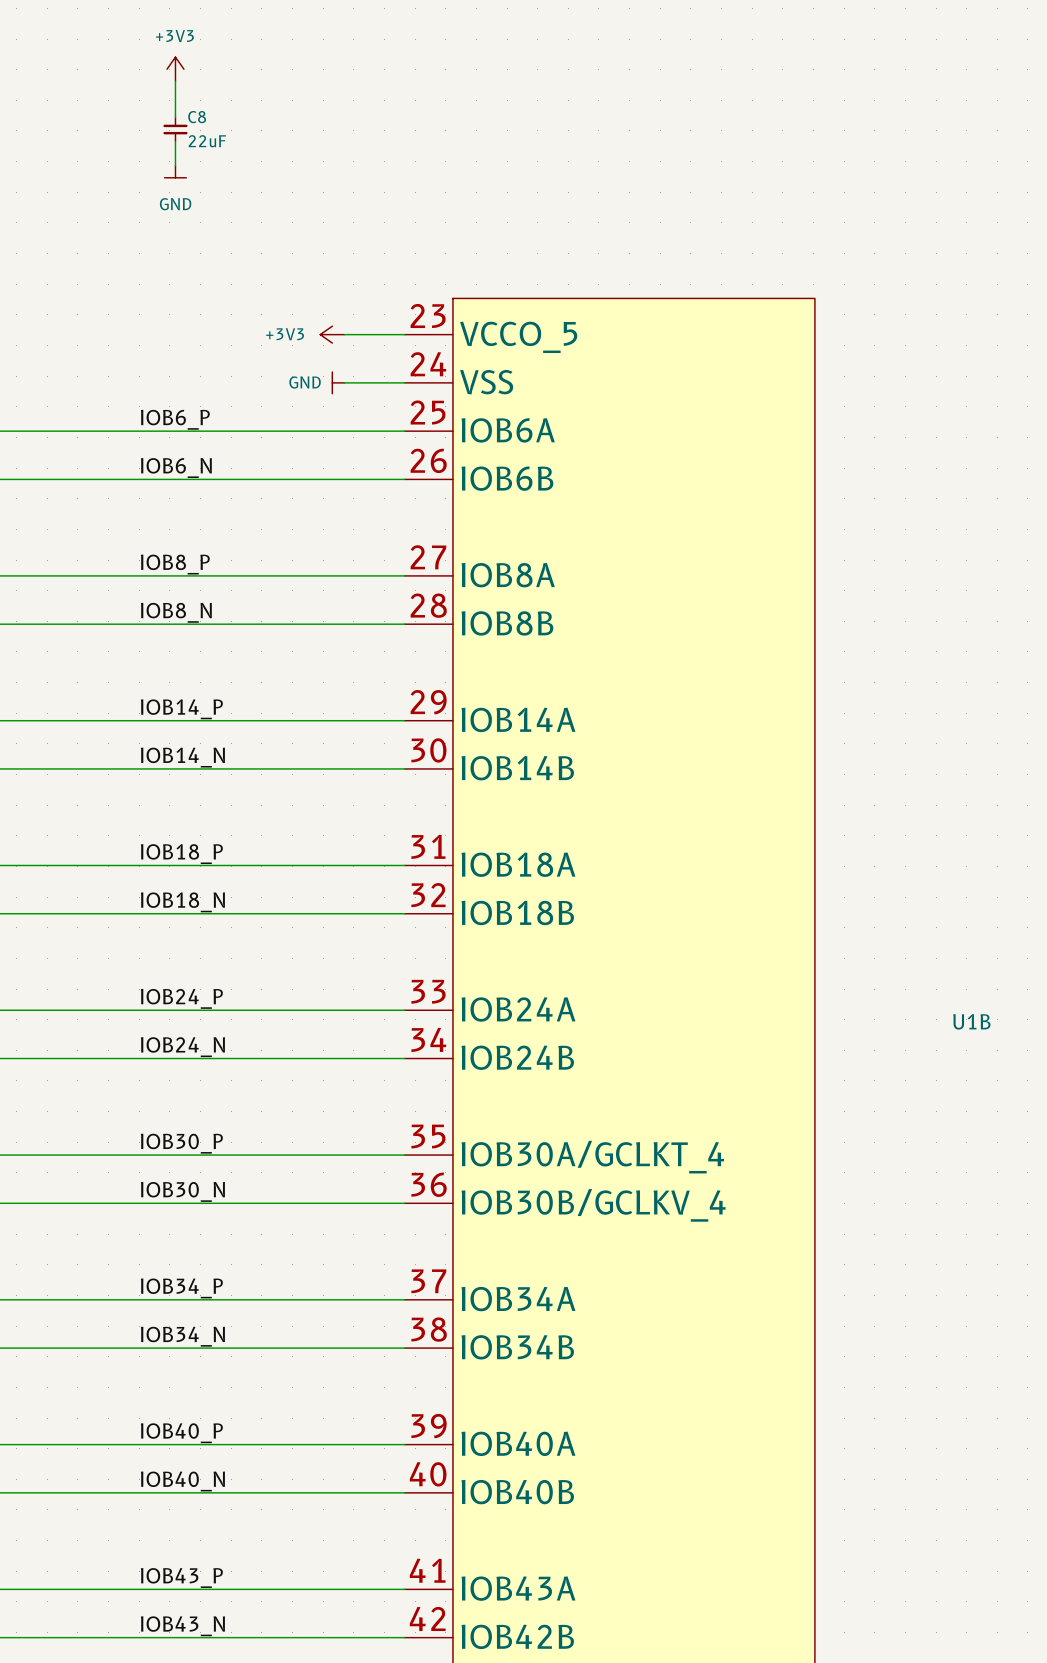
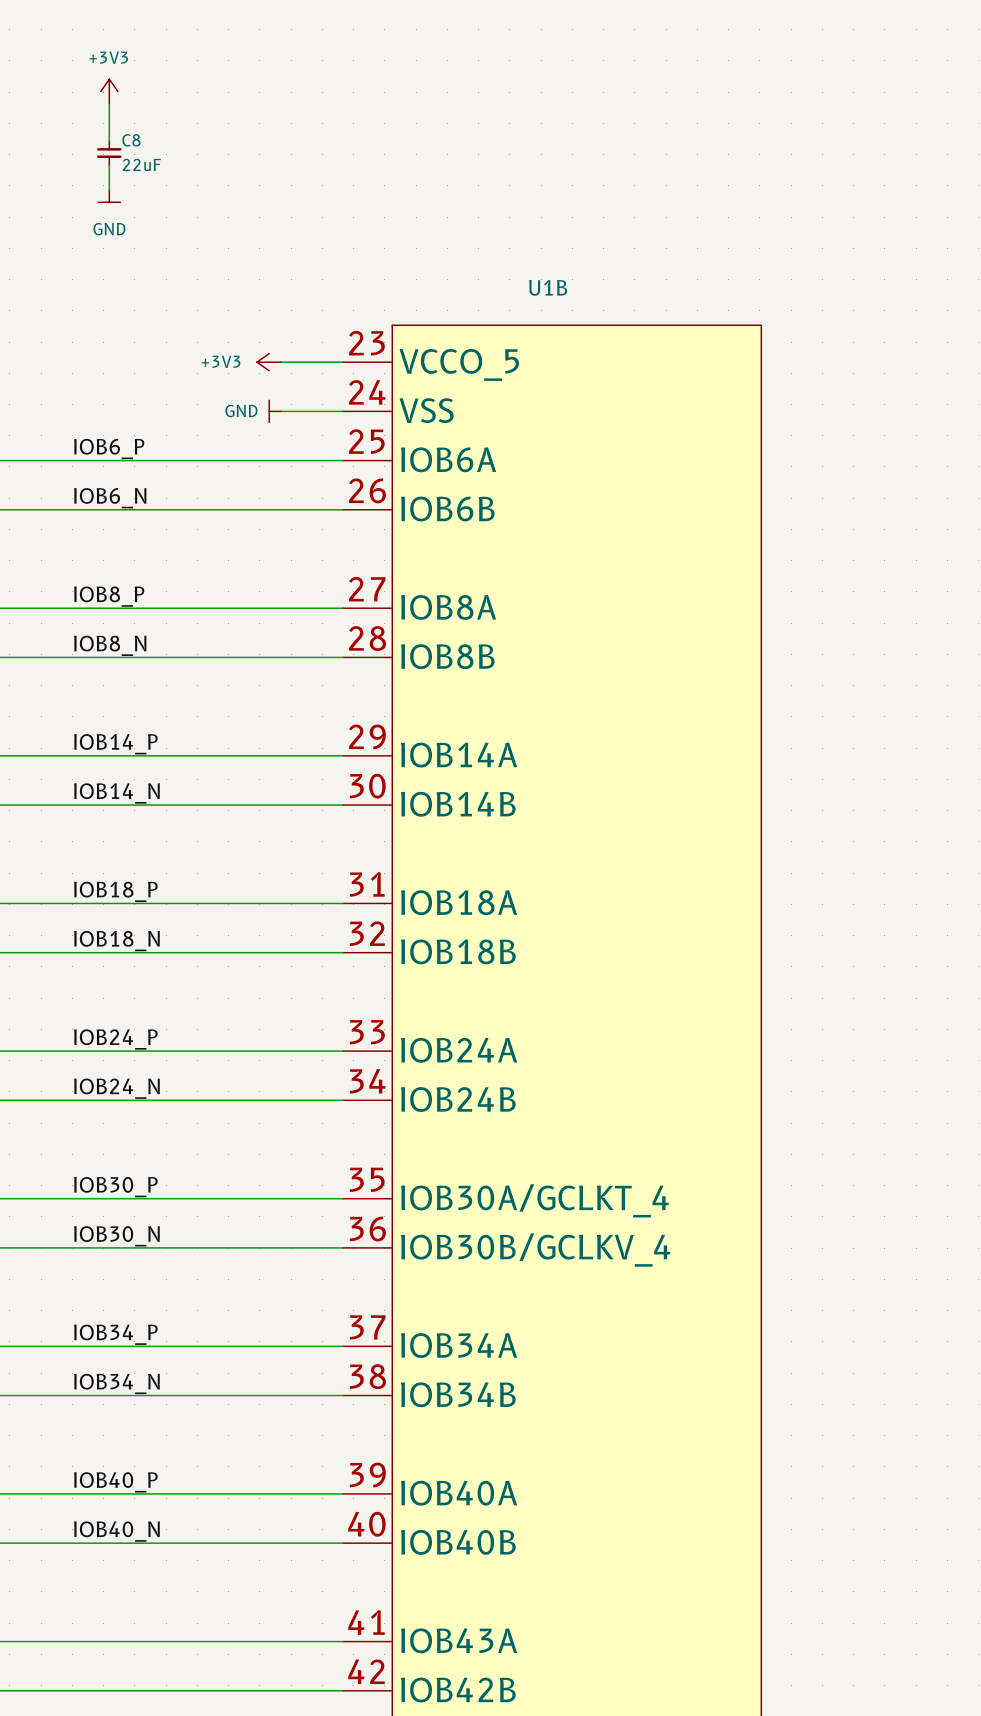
U1B name position: U1B (971, 1021) -> U1B (548, 287)
label: IOB43_P (181, 1578) -> none
label: IOB43_N (182, 1626) -> none

